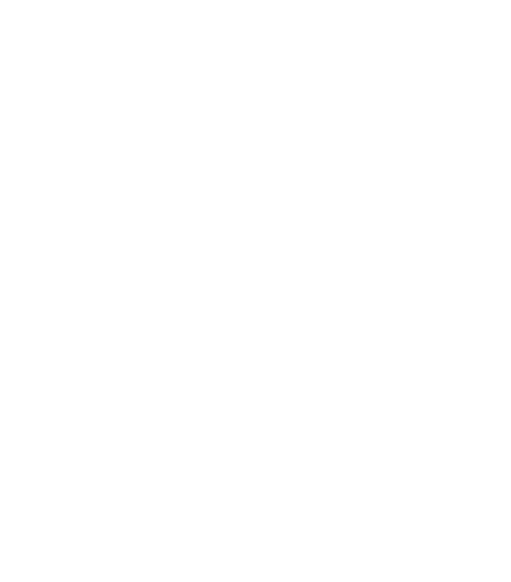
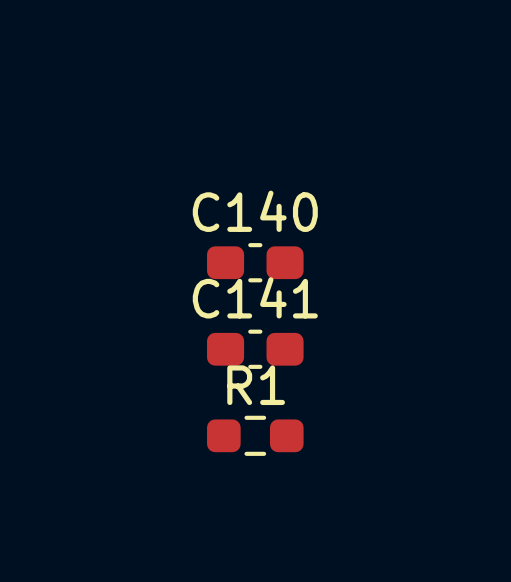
C140: none -> (255, 262)
C141: none -> (255, 349)
R1: none -> (255, 435)

